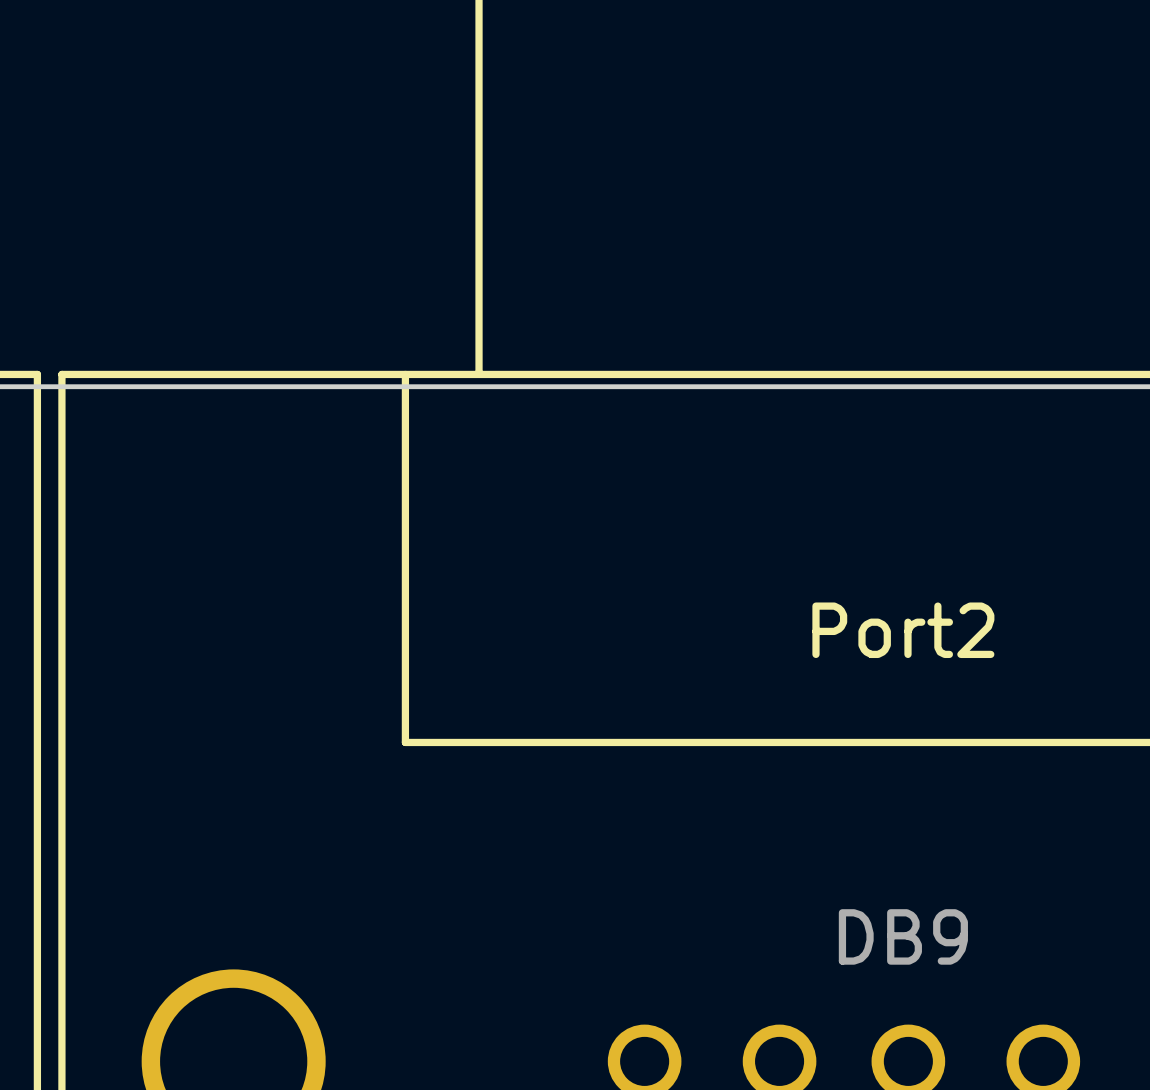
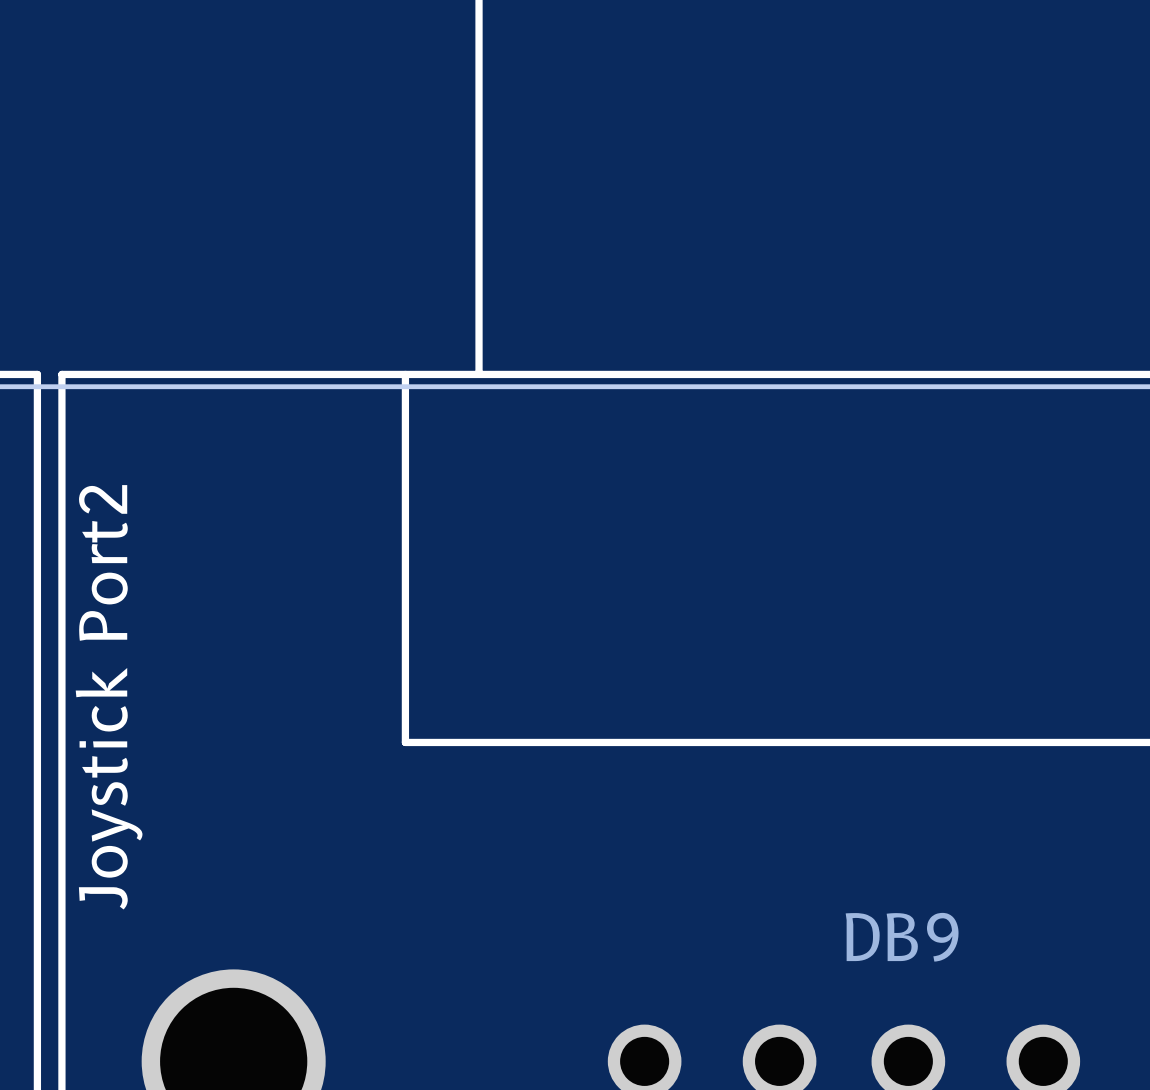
Port2 name: Port2 (903, 630) -> Joystick Port2 (109, 697)

